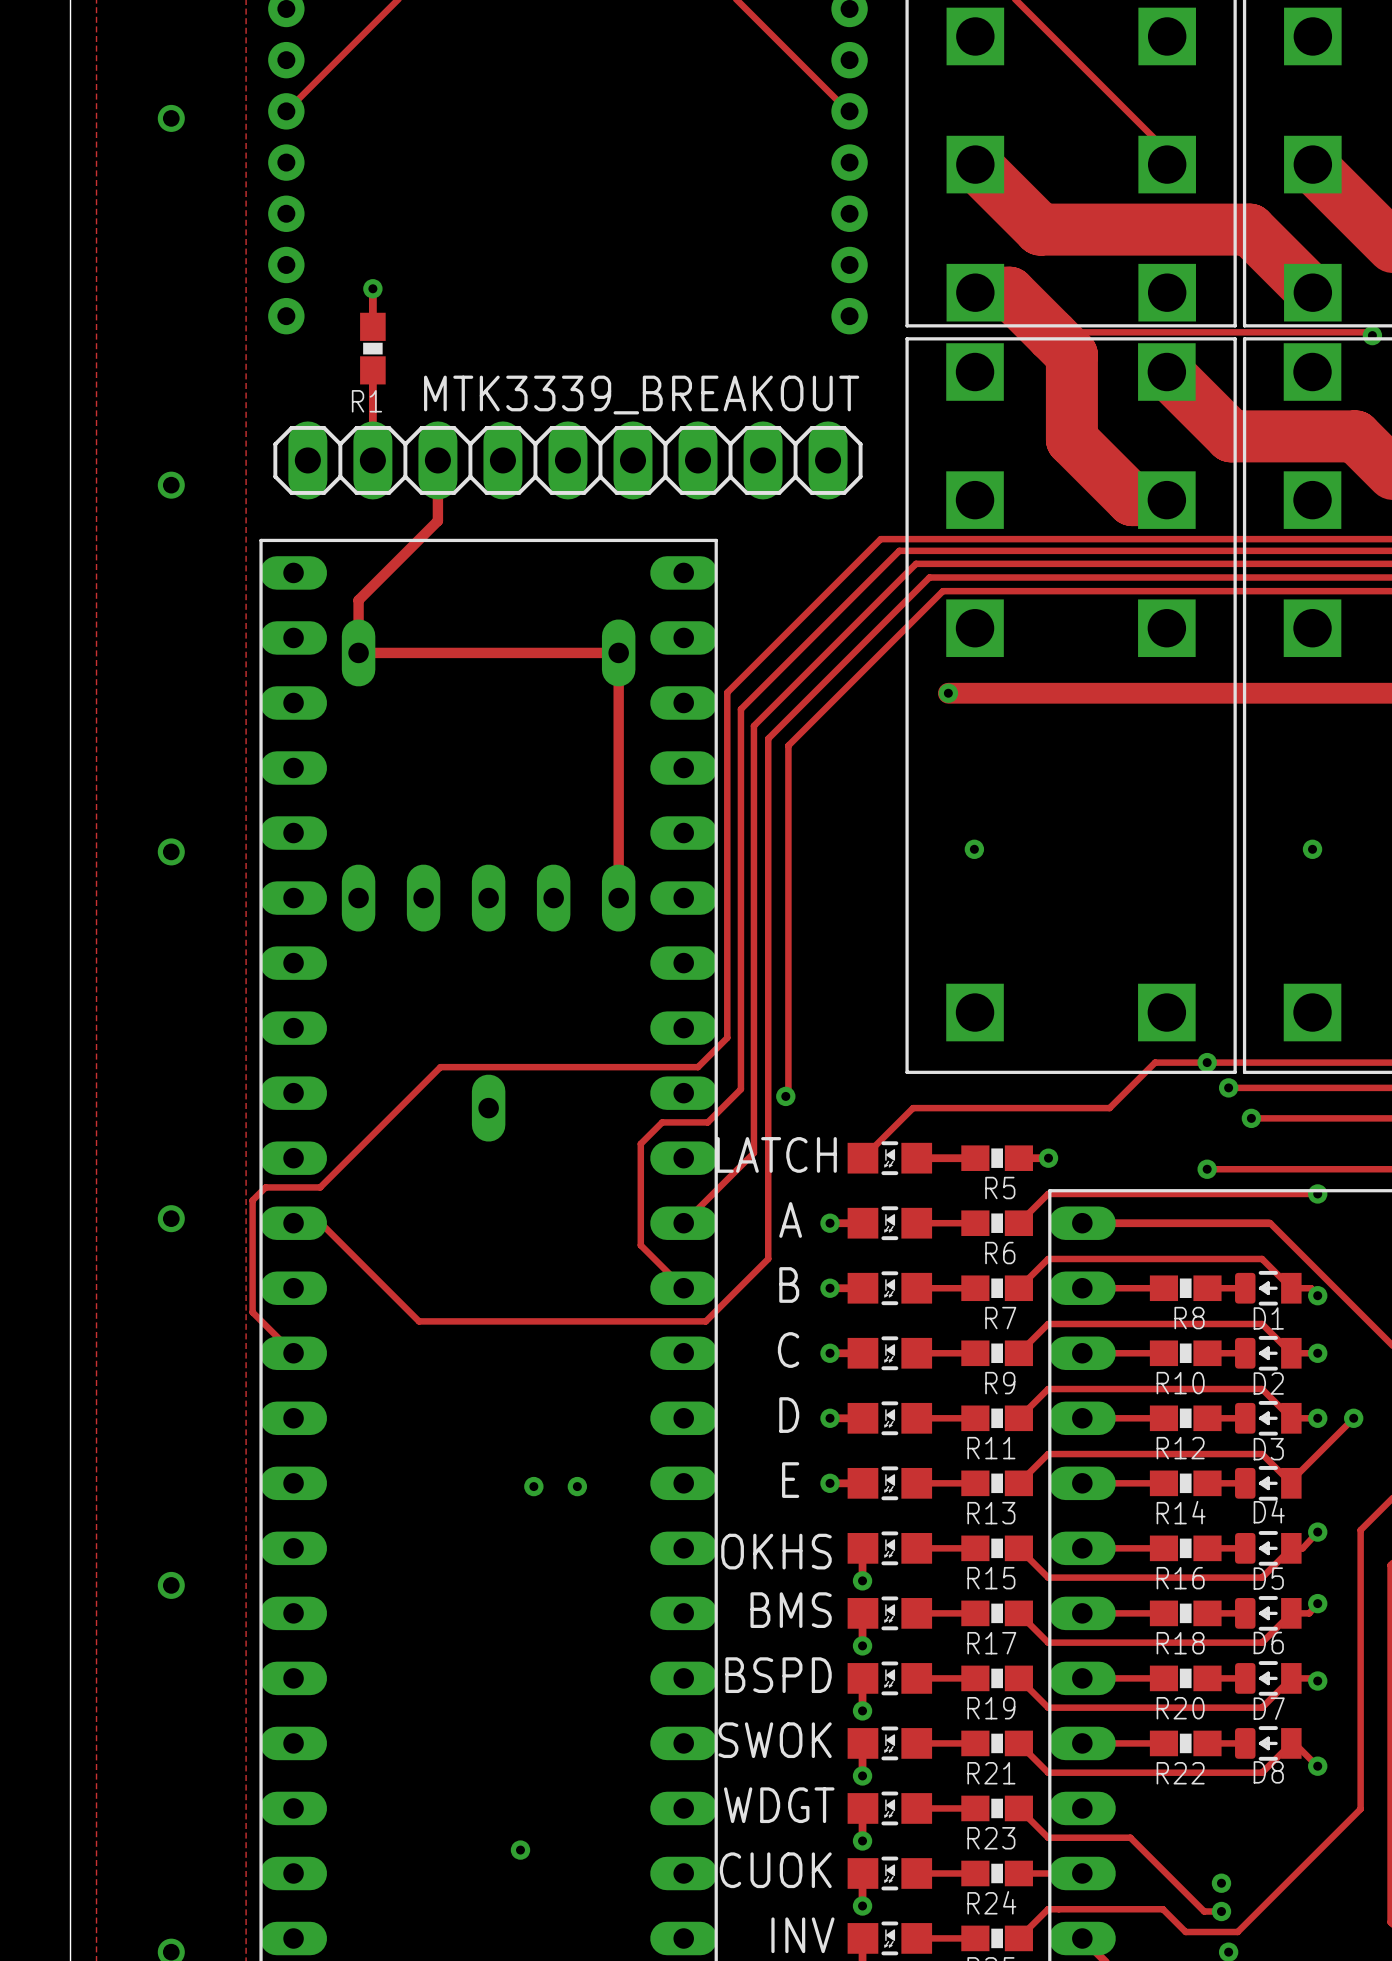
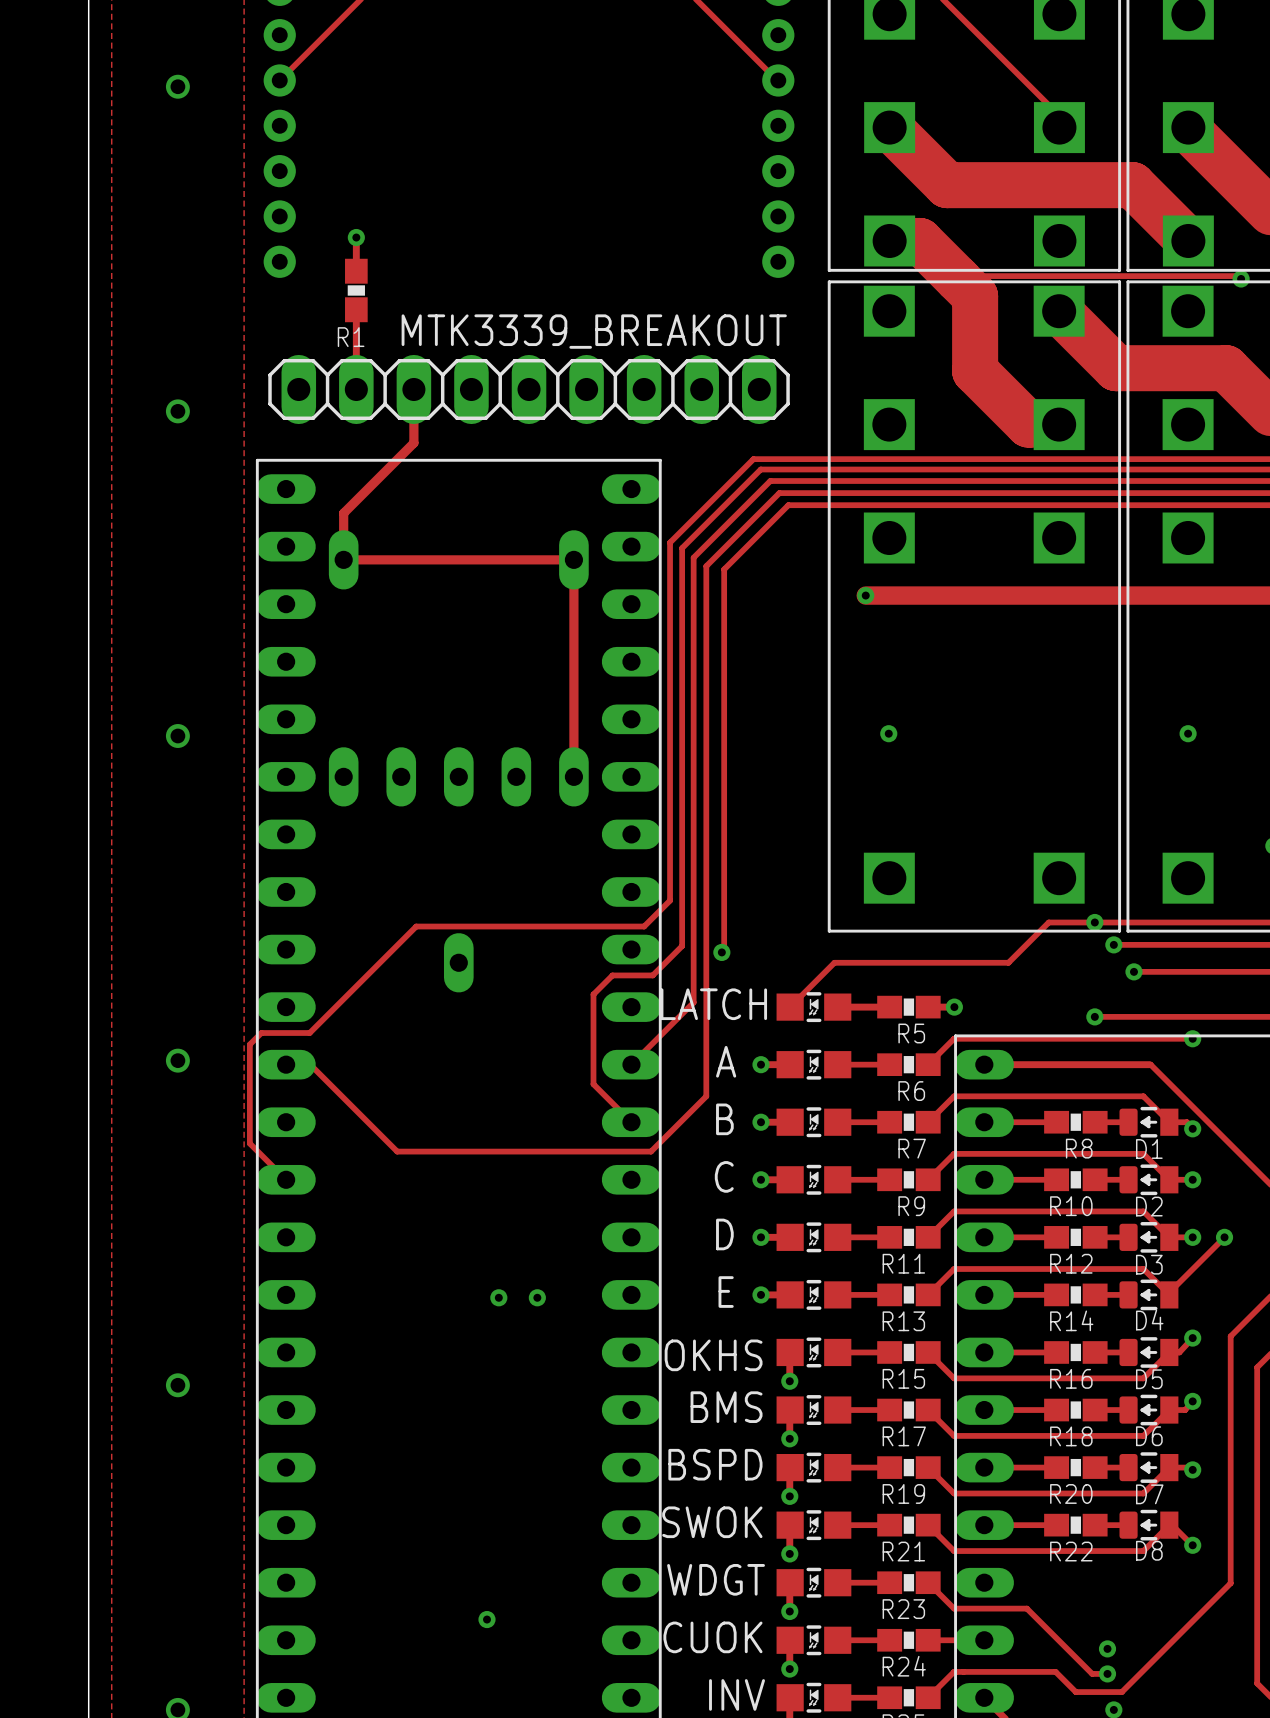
track: (880, 539) (727, 692) -> (805, 459) (753, 459) (670, 542) (670, 594)
track: (899, 550) (740, 709) -> (822, 469) (760, 469) (682, 548) (682, 609)
track: (916, 563) (753, 725) -> (837, 481) (770, 481) (693, 557) (693, 624)
track: (929, 577) (768, 738) -> (849, 493) (779, 493) (706, 566) (706, 635)
track: (942, 591) (788, 745) -> (860, 505) (788, 505) (724, 569) (724, 641)

